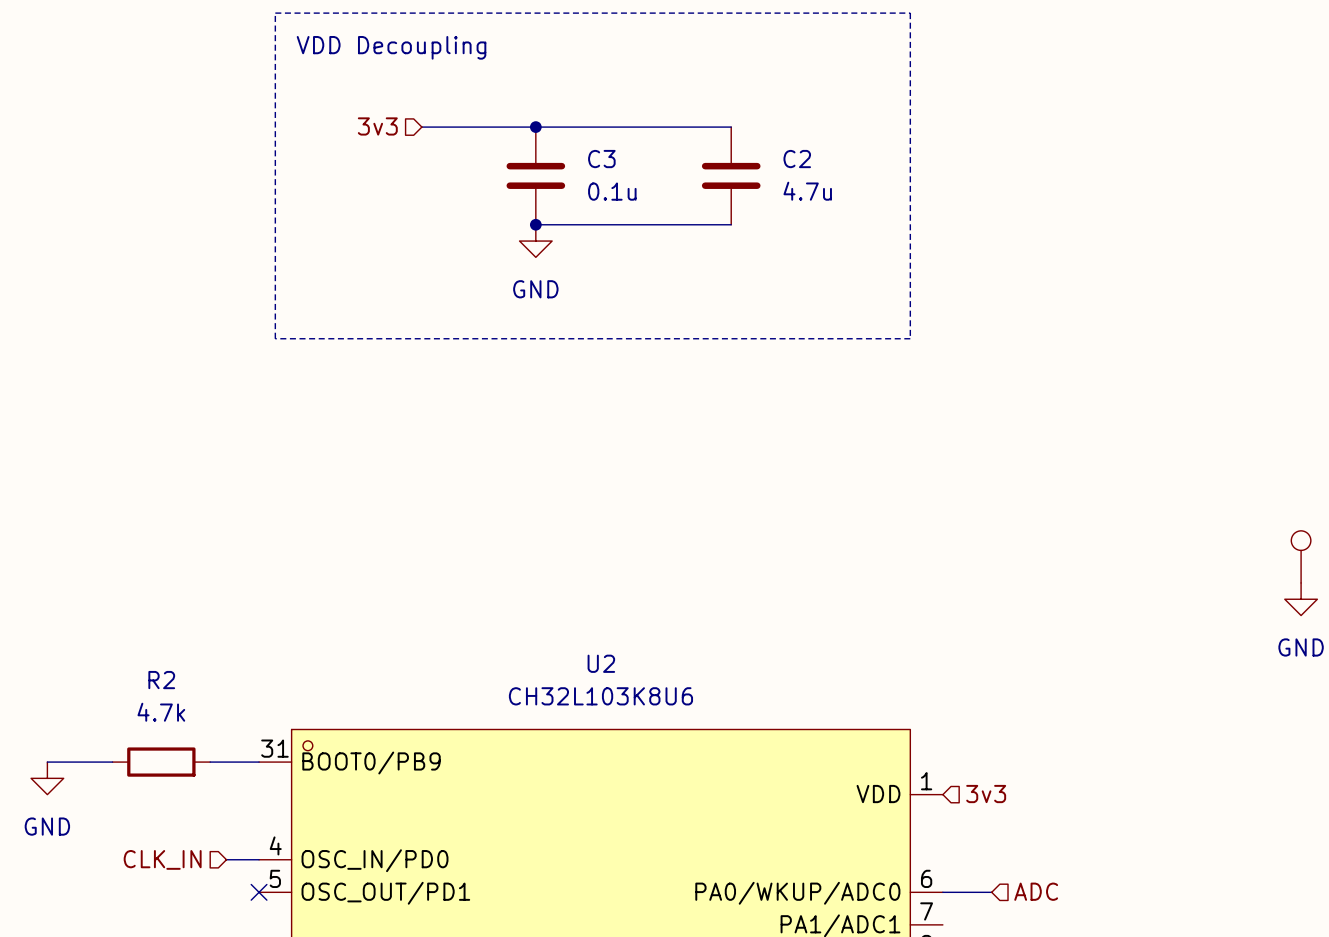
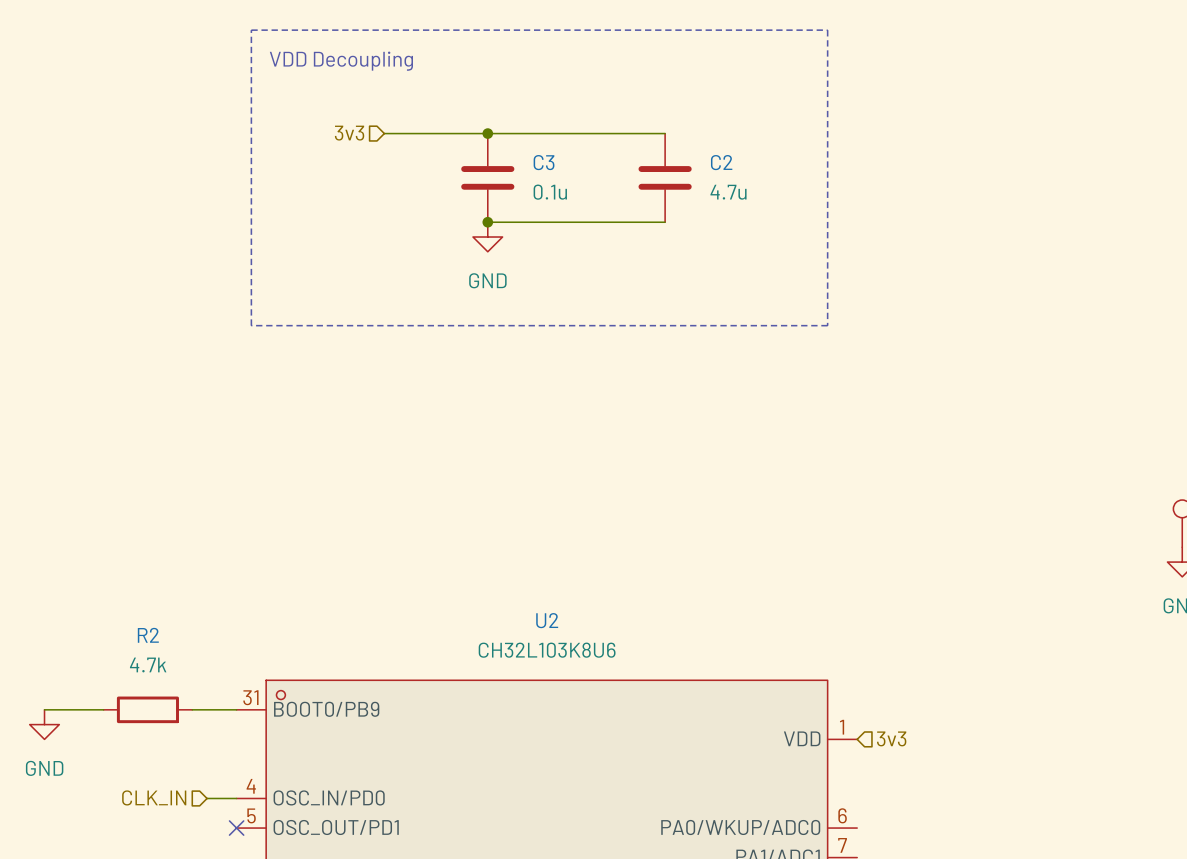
hierarchical label: ADC (1036, 891) -> none
wire: (942, 892) (991, 892) -> none

